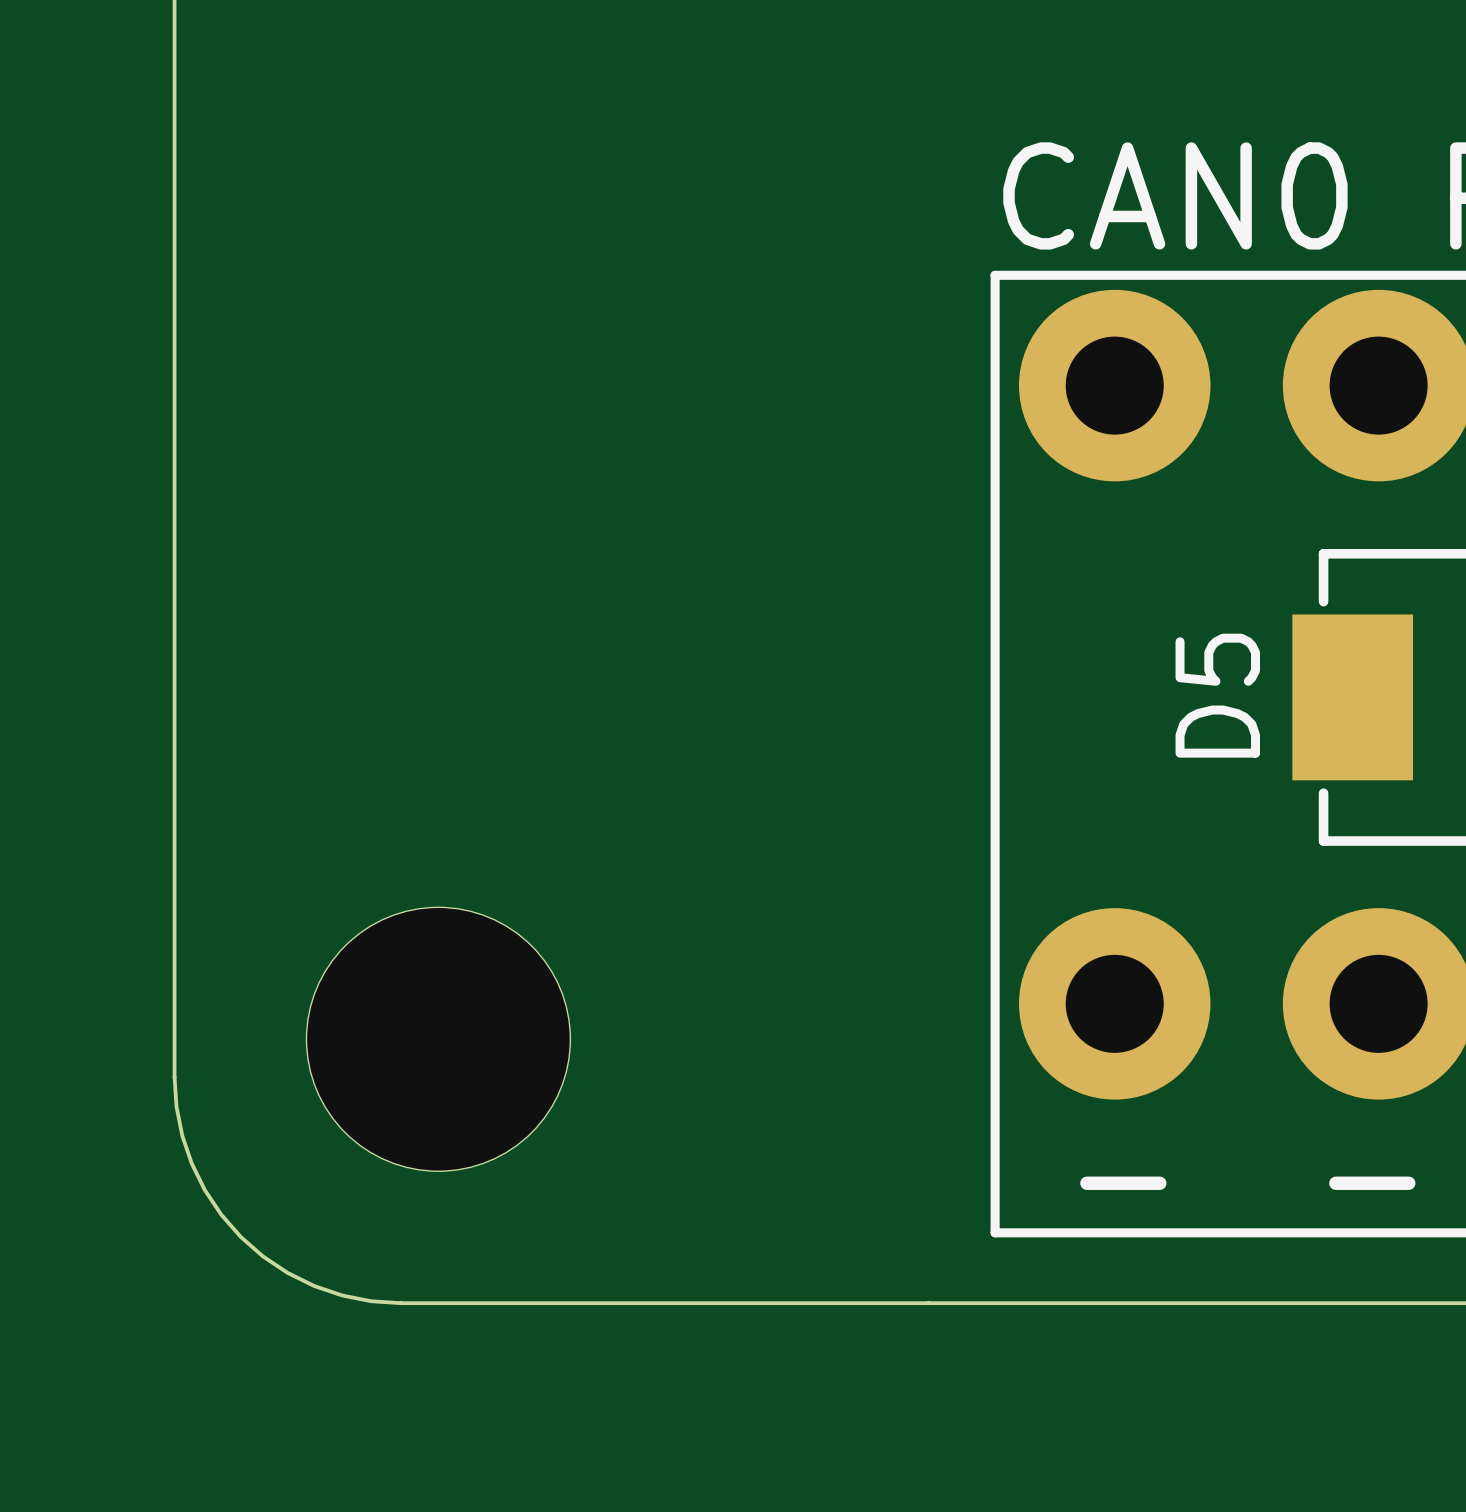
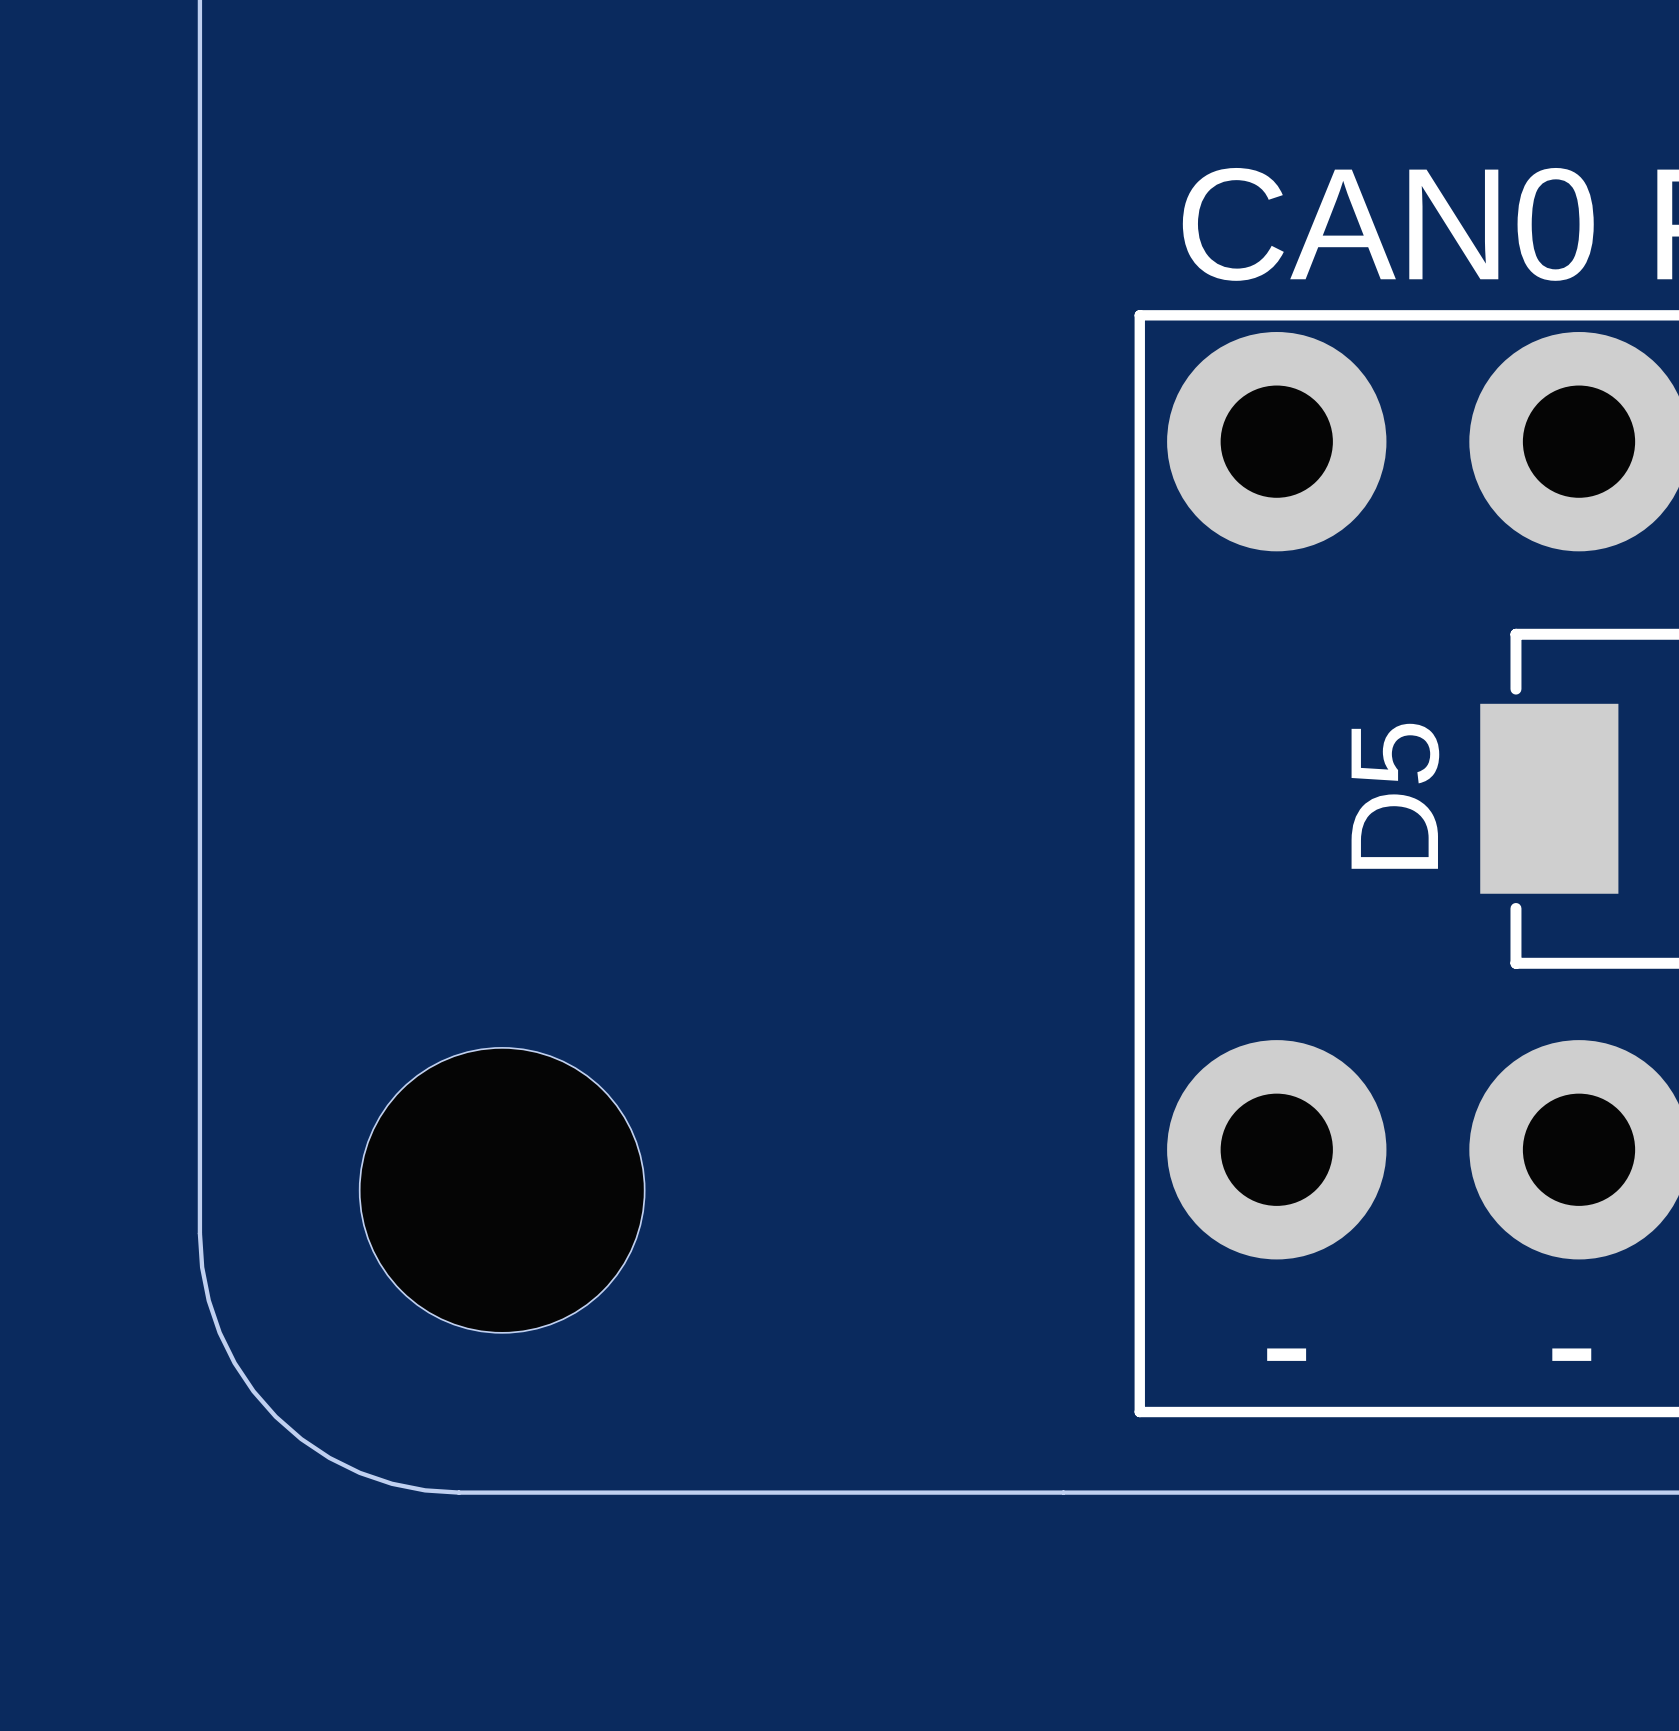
part footprint: [306, 907, 571, 1172] -> [359, 1047, 645, 1333]

